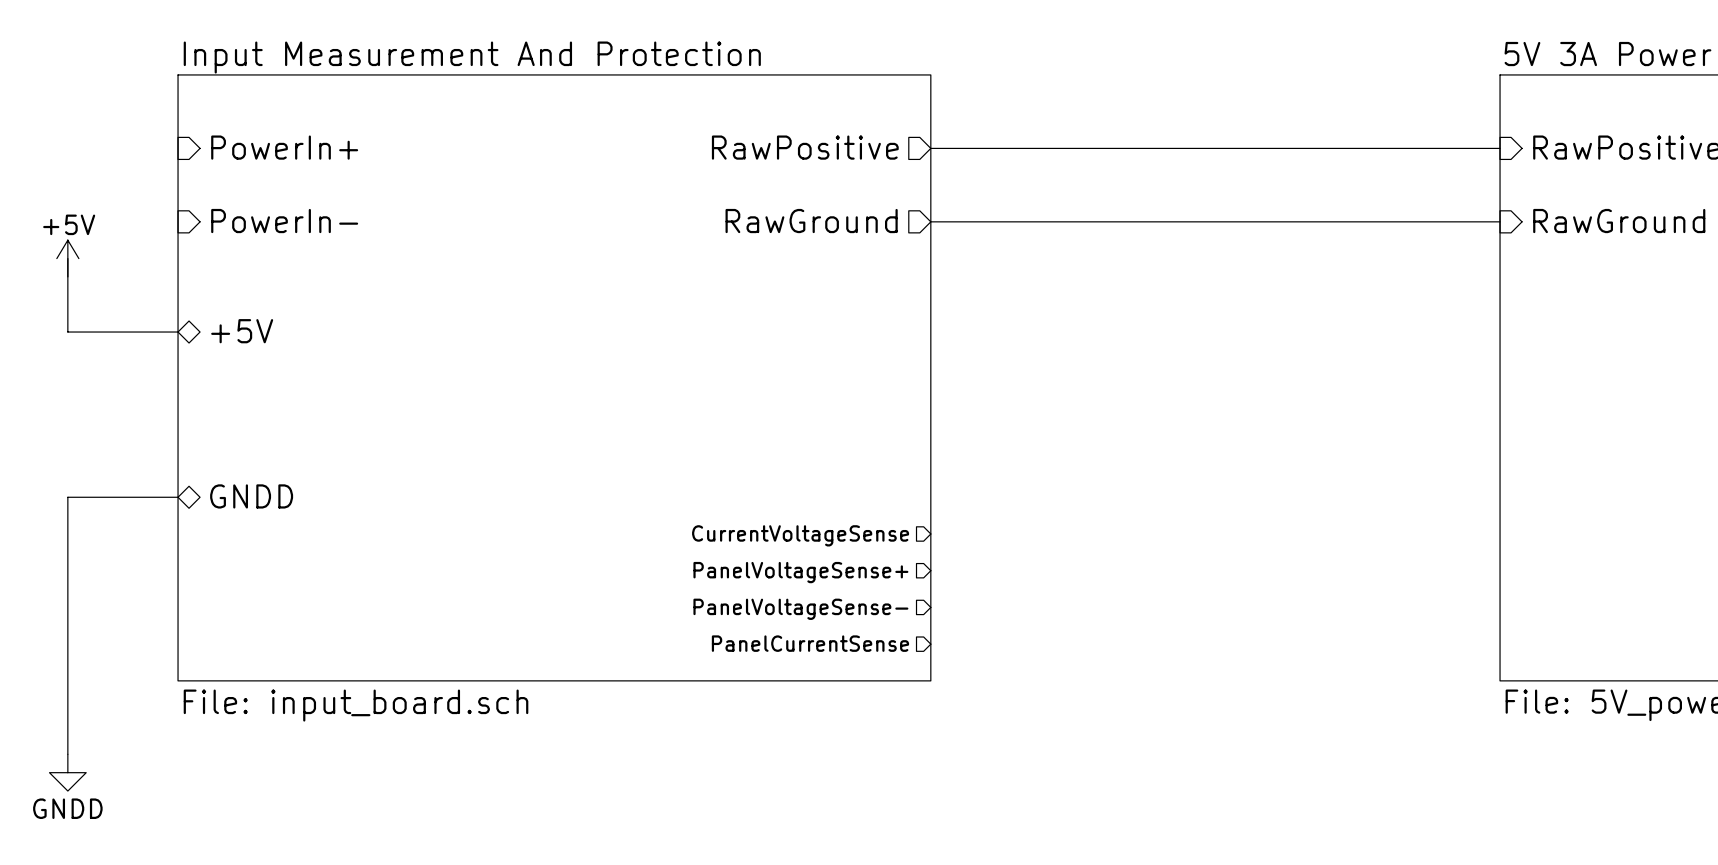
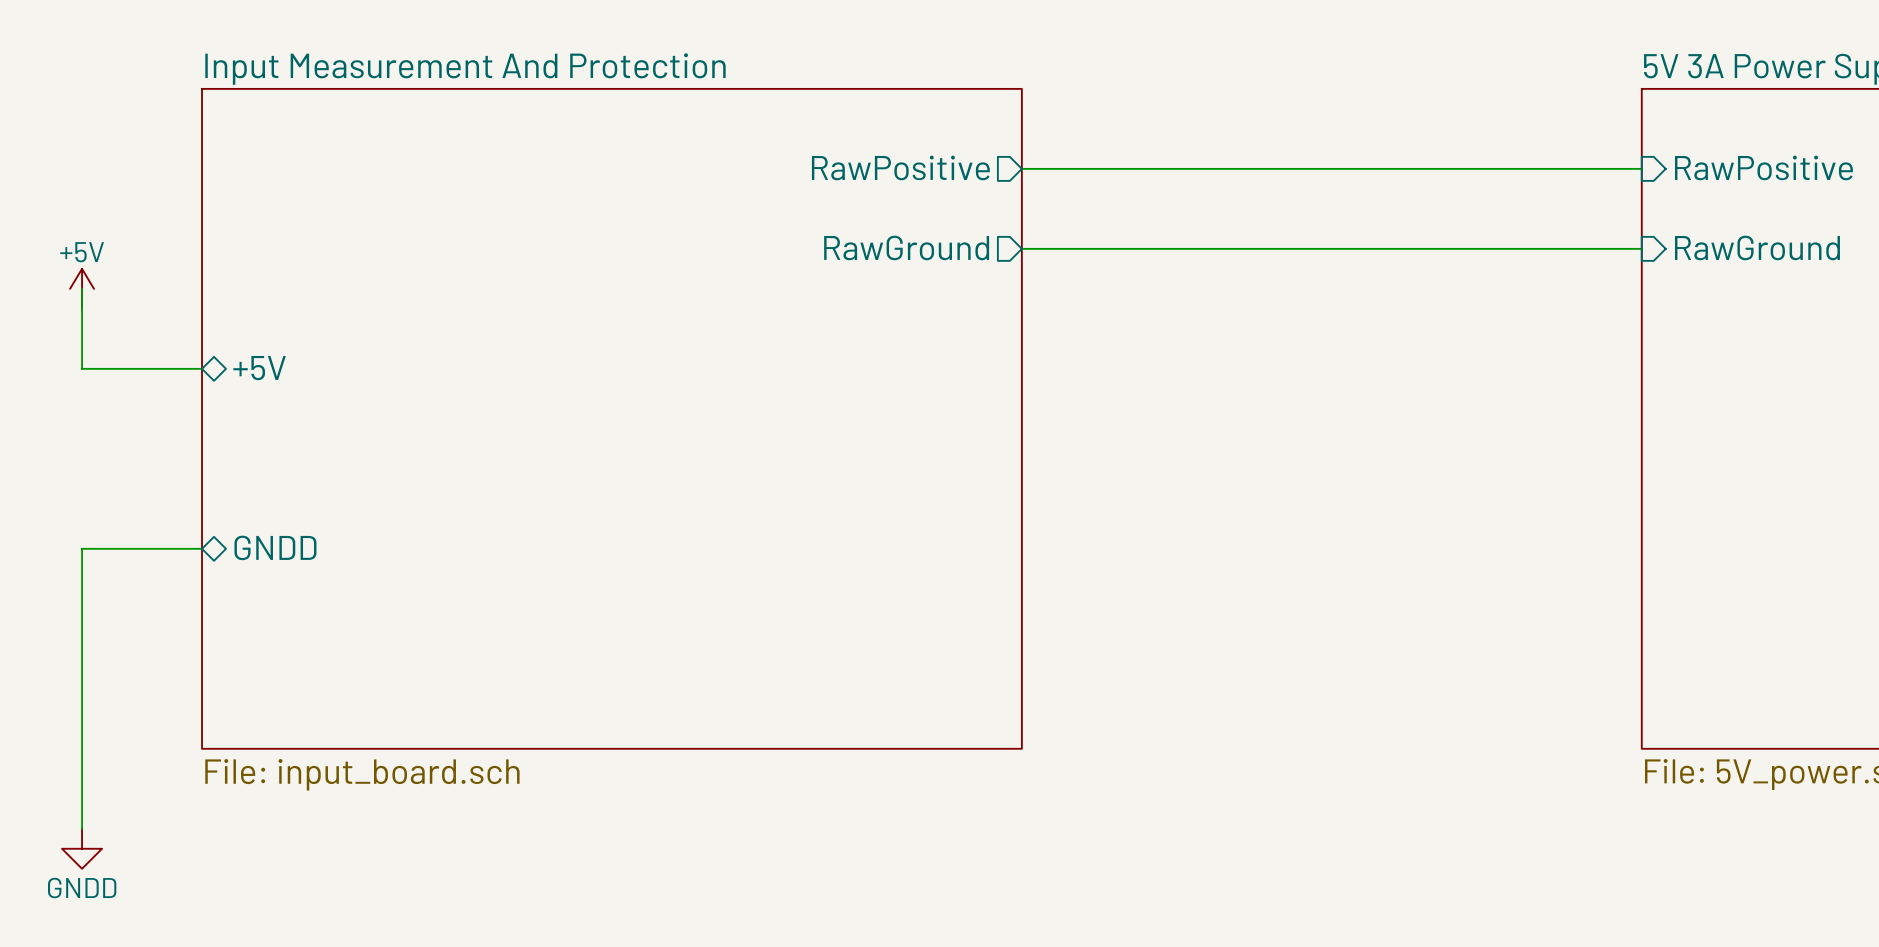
sheet pin: PowerIn+ (284, 147) -> none
sheet pin: PowerIn- (284, 221) -> none
sheet pin: CurrentVoltageSense (800, 535) -> none
sheet pin: PanelVoltageSense+ (800, 572) -> none
sheet pin: PanelVoltageSense- (800, 609) -> none
sheet pin: PanelCurrentSense (810, 643) -> none

